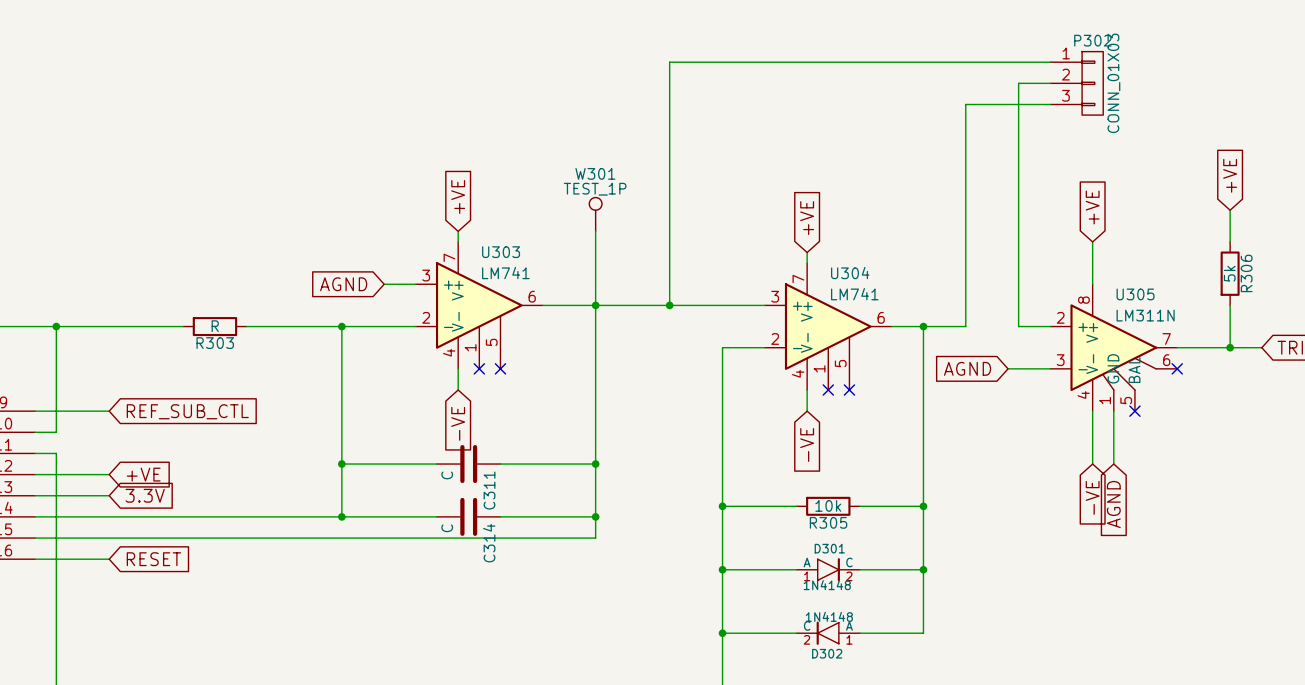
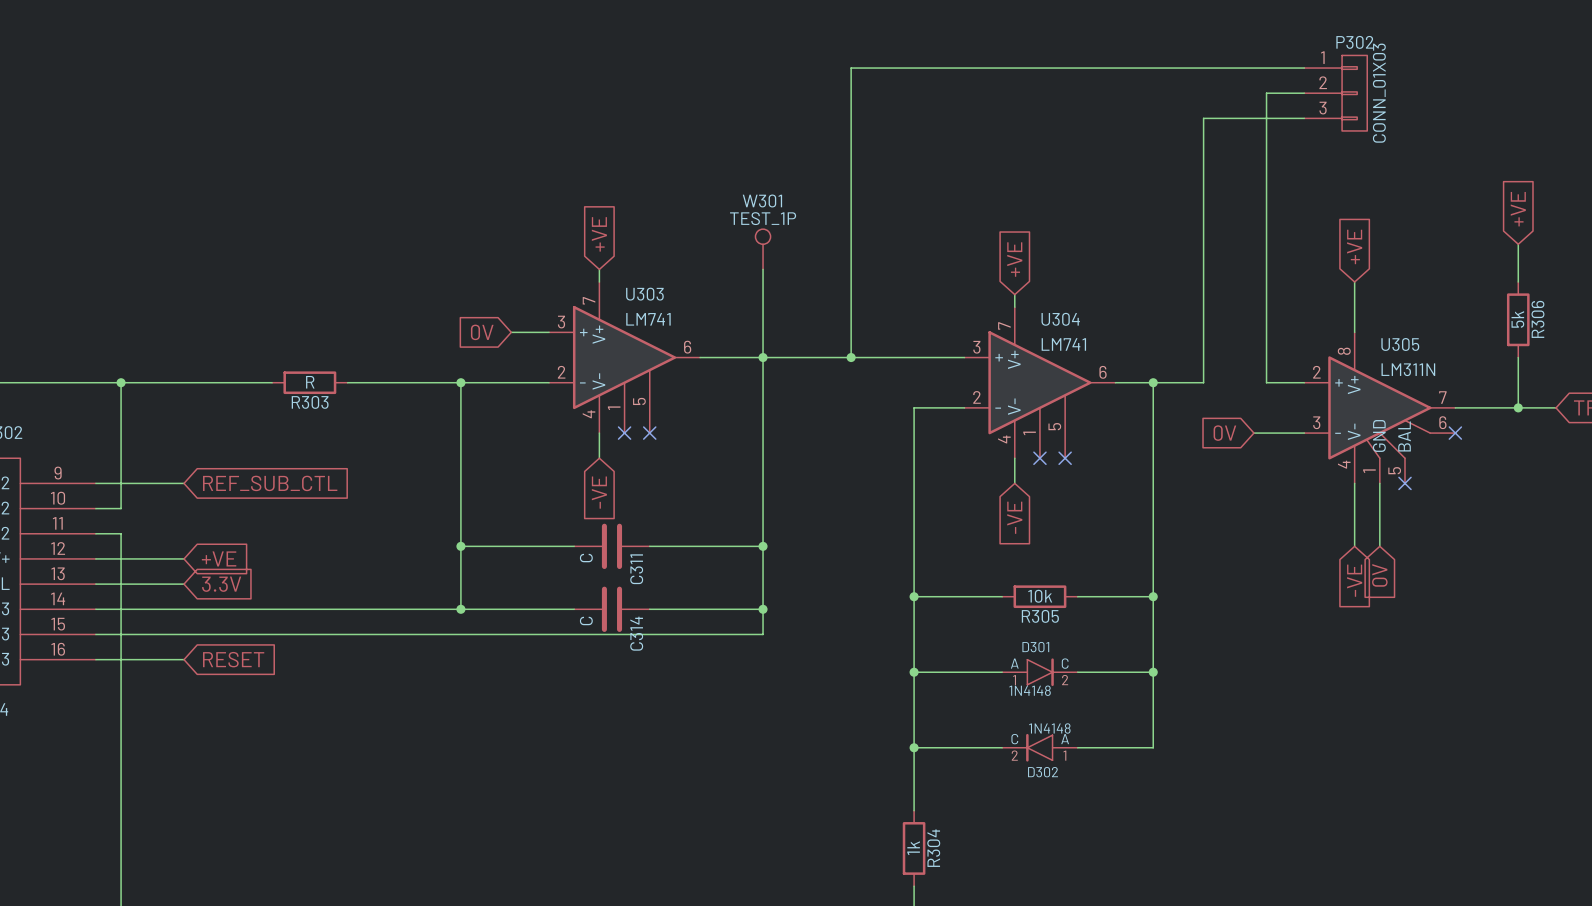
global label: AGND (343, 284) -> 0V (482, 332)
global label: AGND (967, 368) -> 0V (1224, 433)
global label: AGND (1113, 504) -> 0V (1379, 575)

